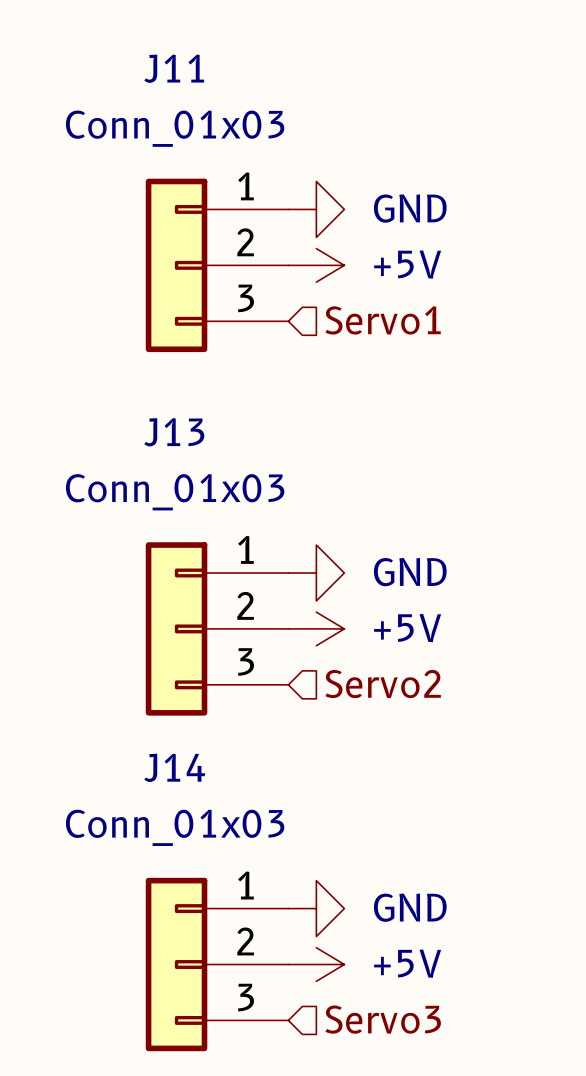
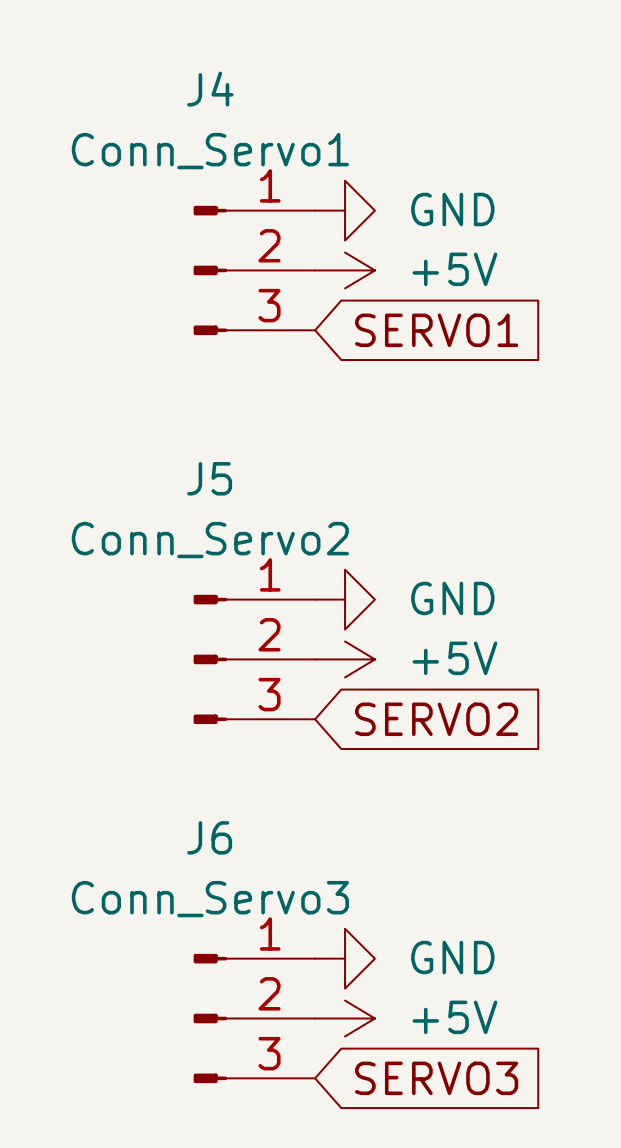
J11: Conn_01x03 (217, 265) -> none
J4: none -> Conn_Servo1 (254, 270)
hierarchical label: Servo1 (383, 320) -> none
global label: none -> SERVO1 (436, 330)
J13: Conn_01x03 (217, 628) -> none
J5: none -> Conn_Servo2 (254, 659)
hierarchical label: Servo2 (383, 684) -> none
global label: none -> SERVO2 (436, 719)
J14: Conn_01x03 (217, 964) -> none
J6: none -> Conn_Servo3 (254, 1018)
hierarchical label: Servo3 (383, 1019) -> none
global label: none -> SERVO3 (436, 1078)

